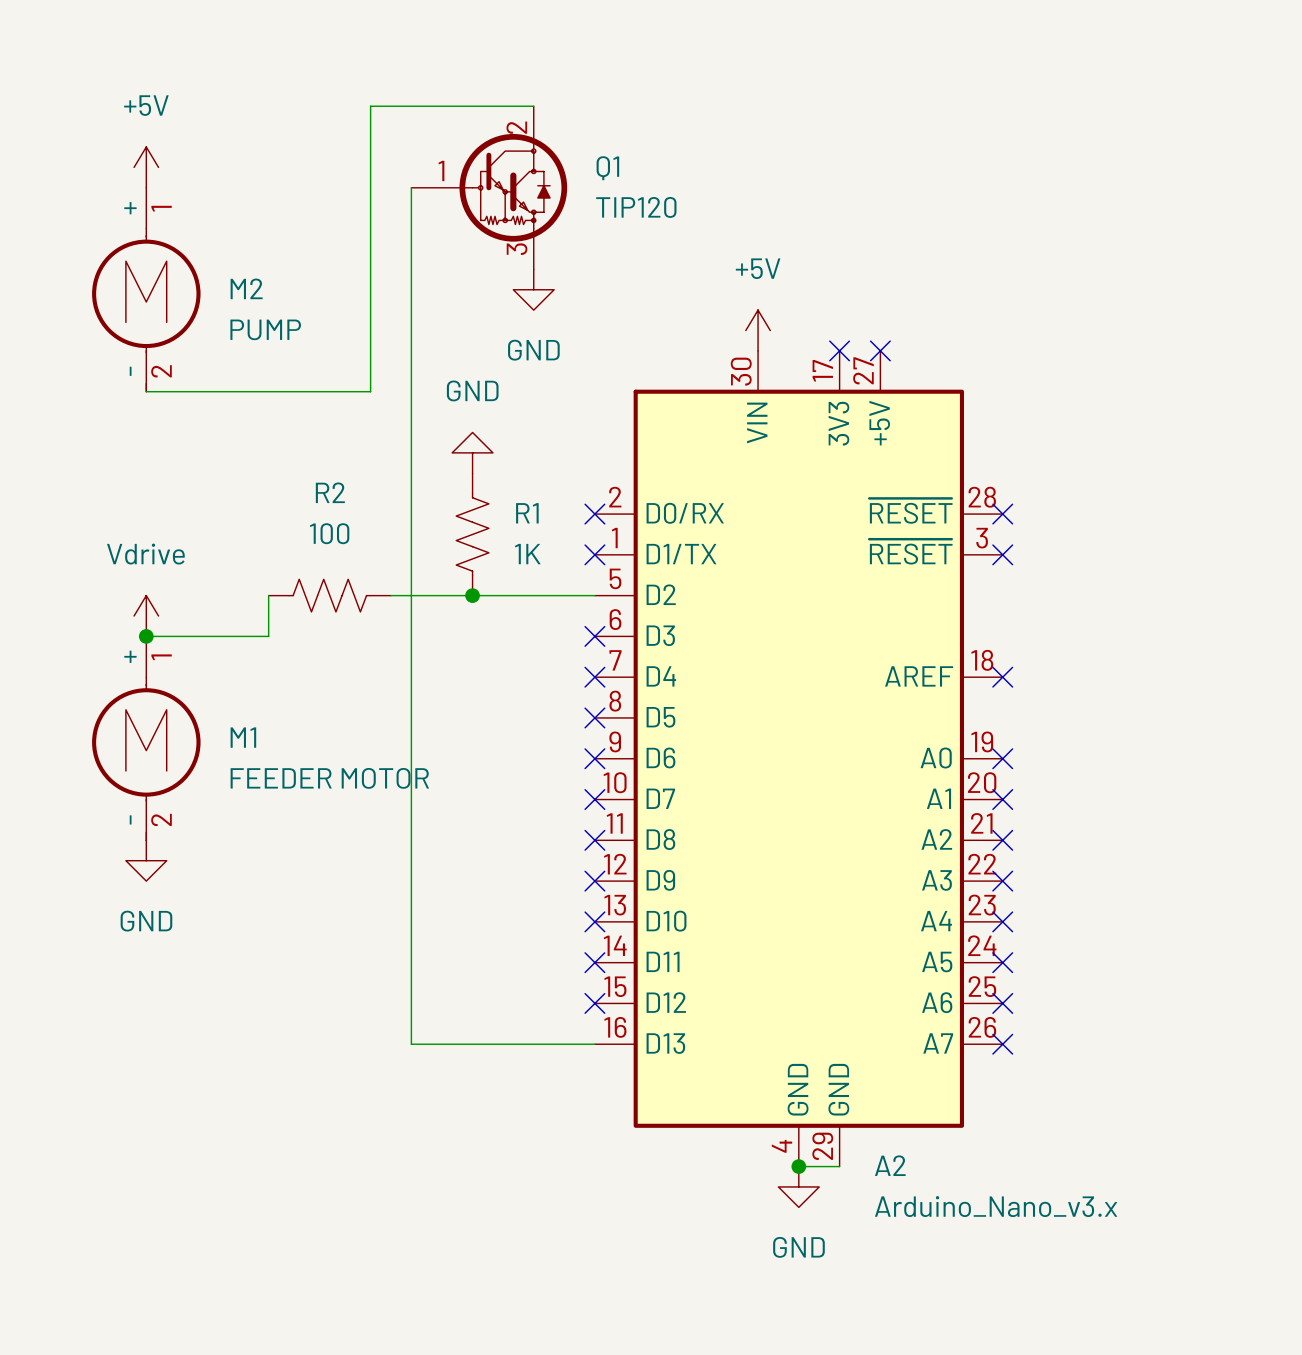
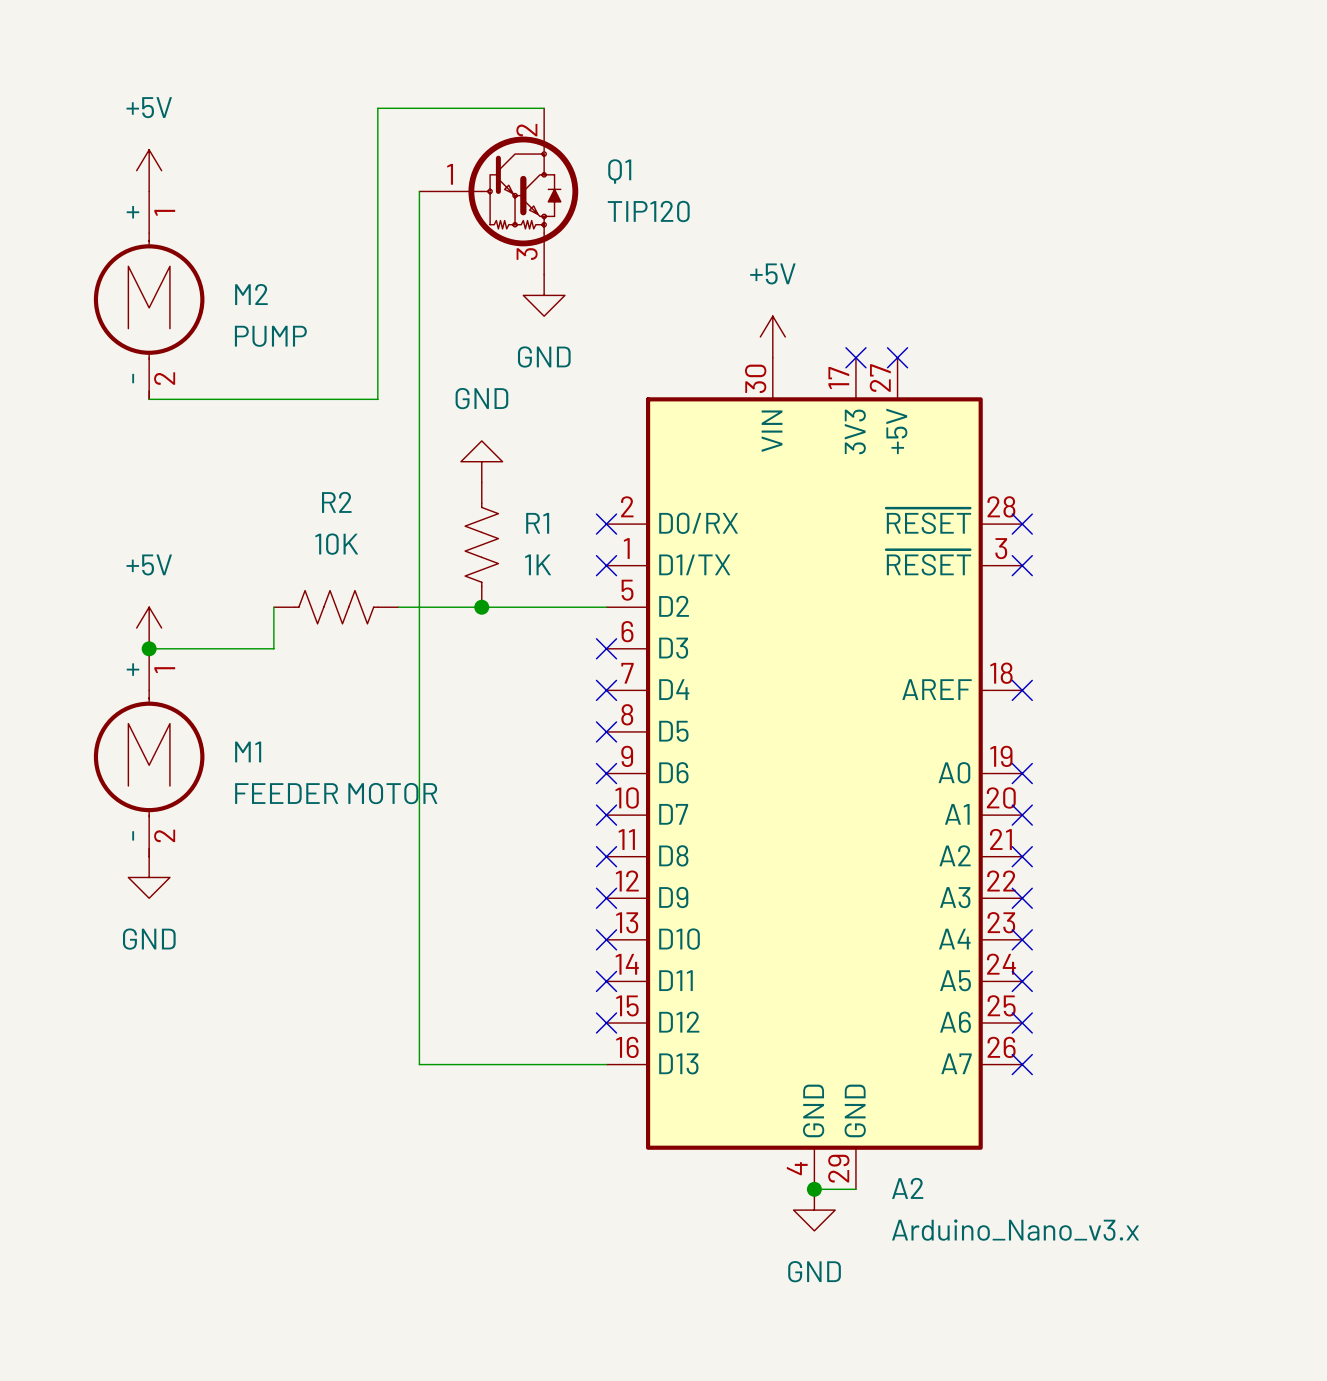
R2 value: 100 (329, 533) -> 10K (336, 544)
power symbol: Vdrive (146, 616) -> +5V (149, 628)

